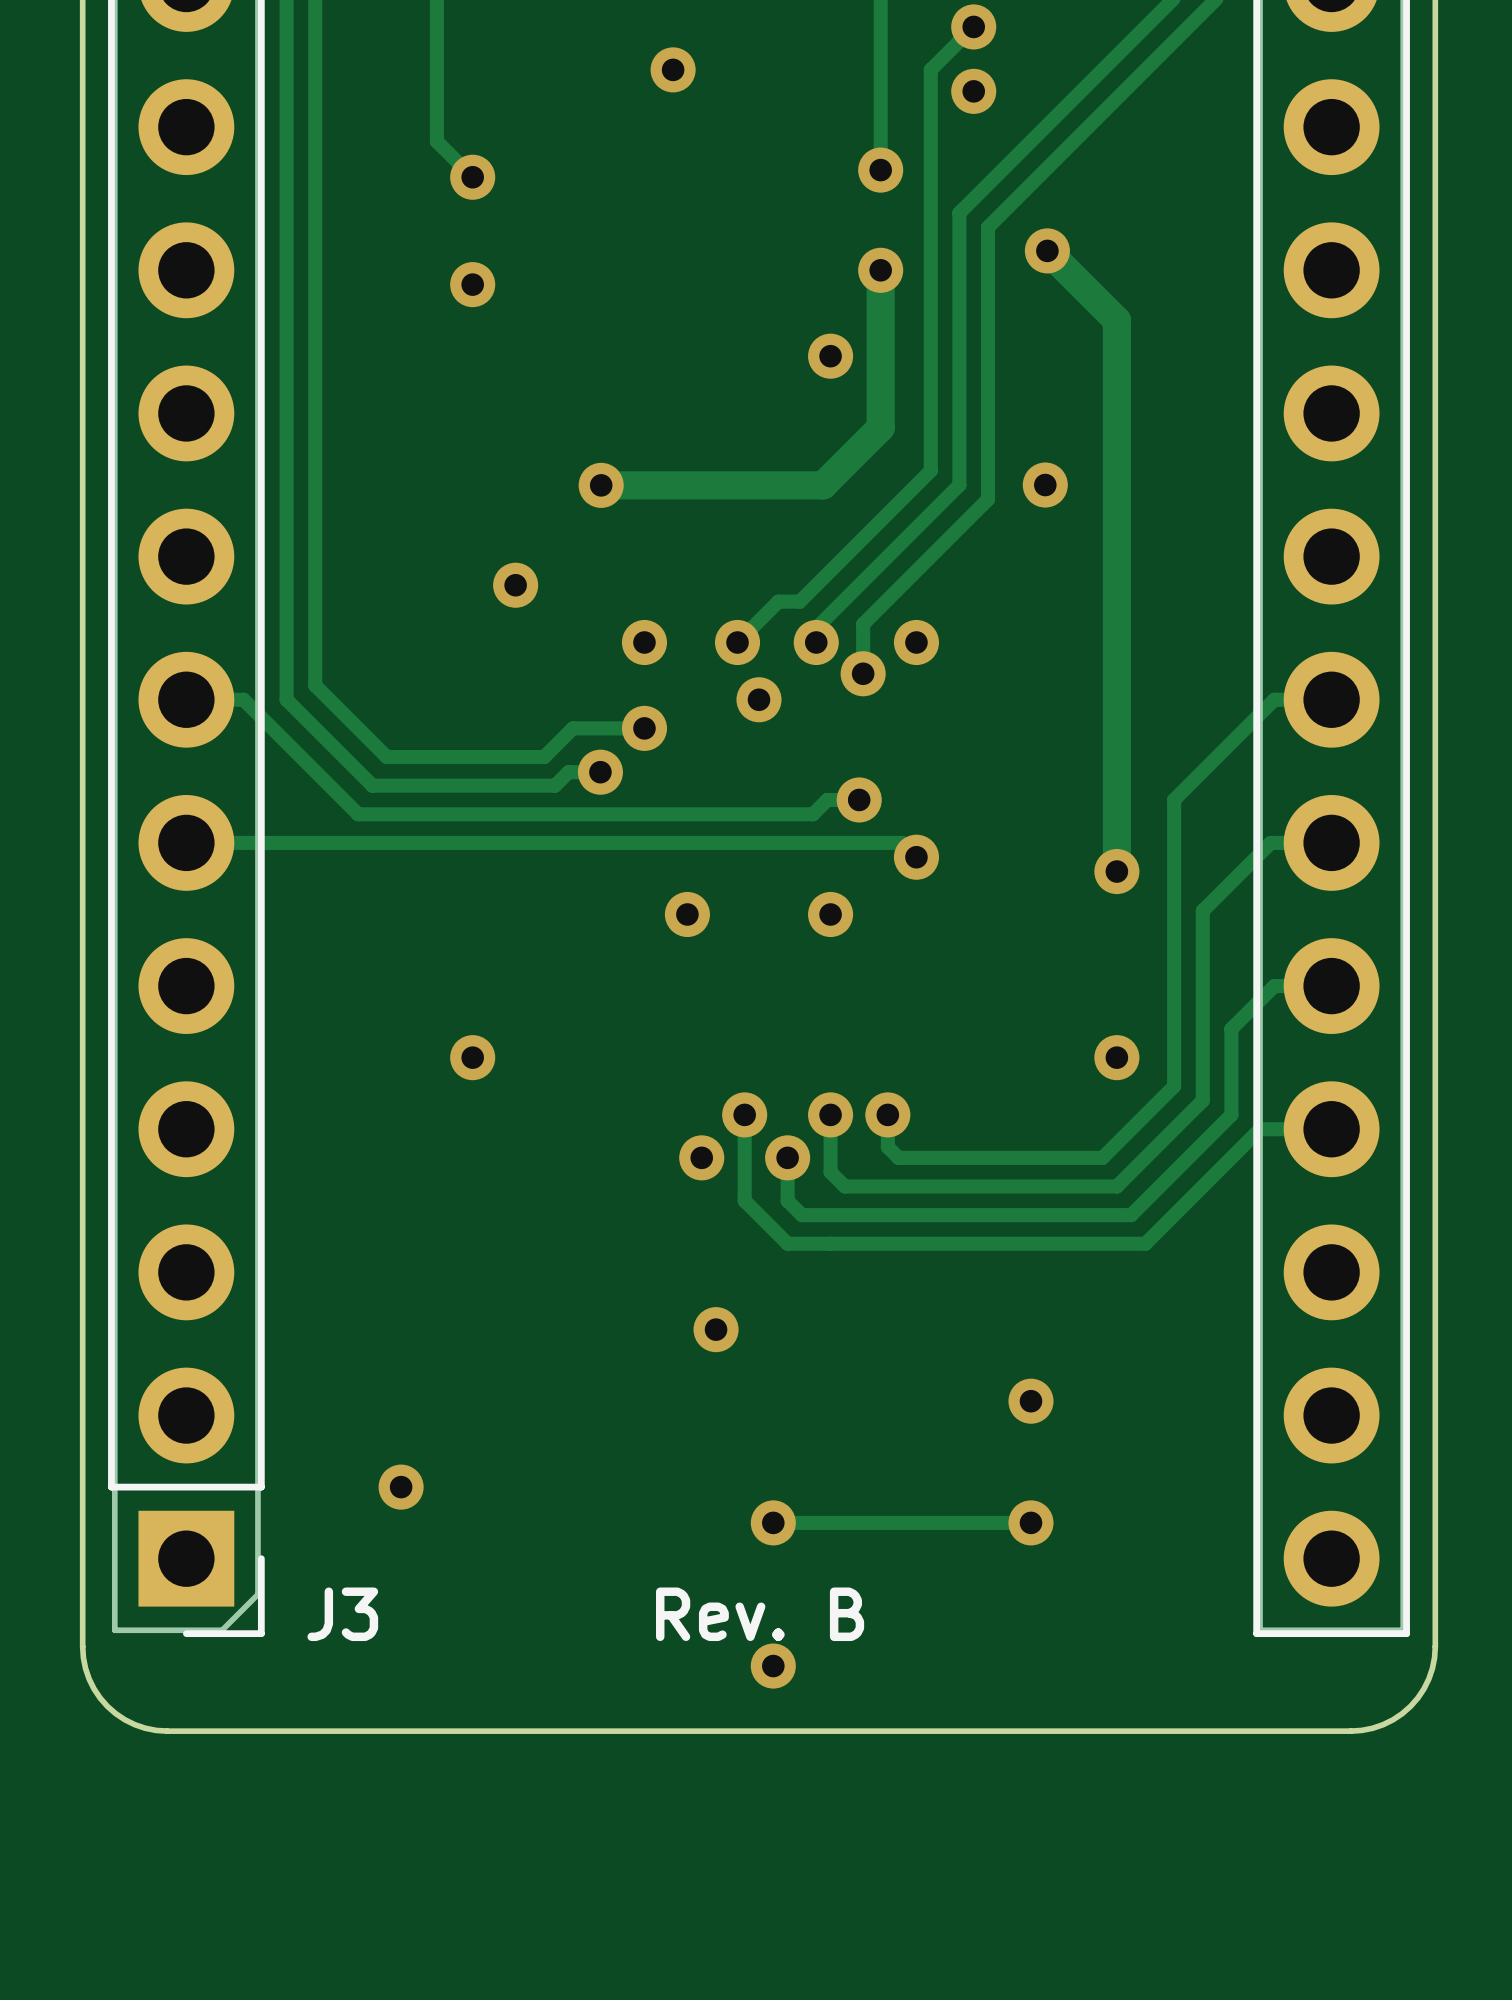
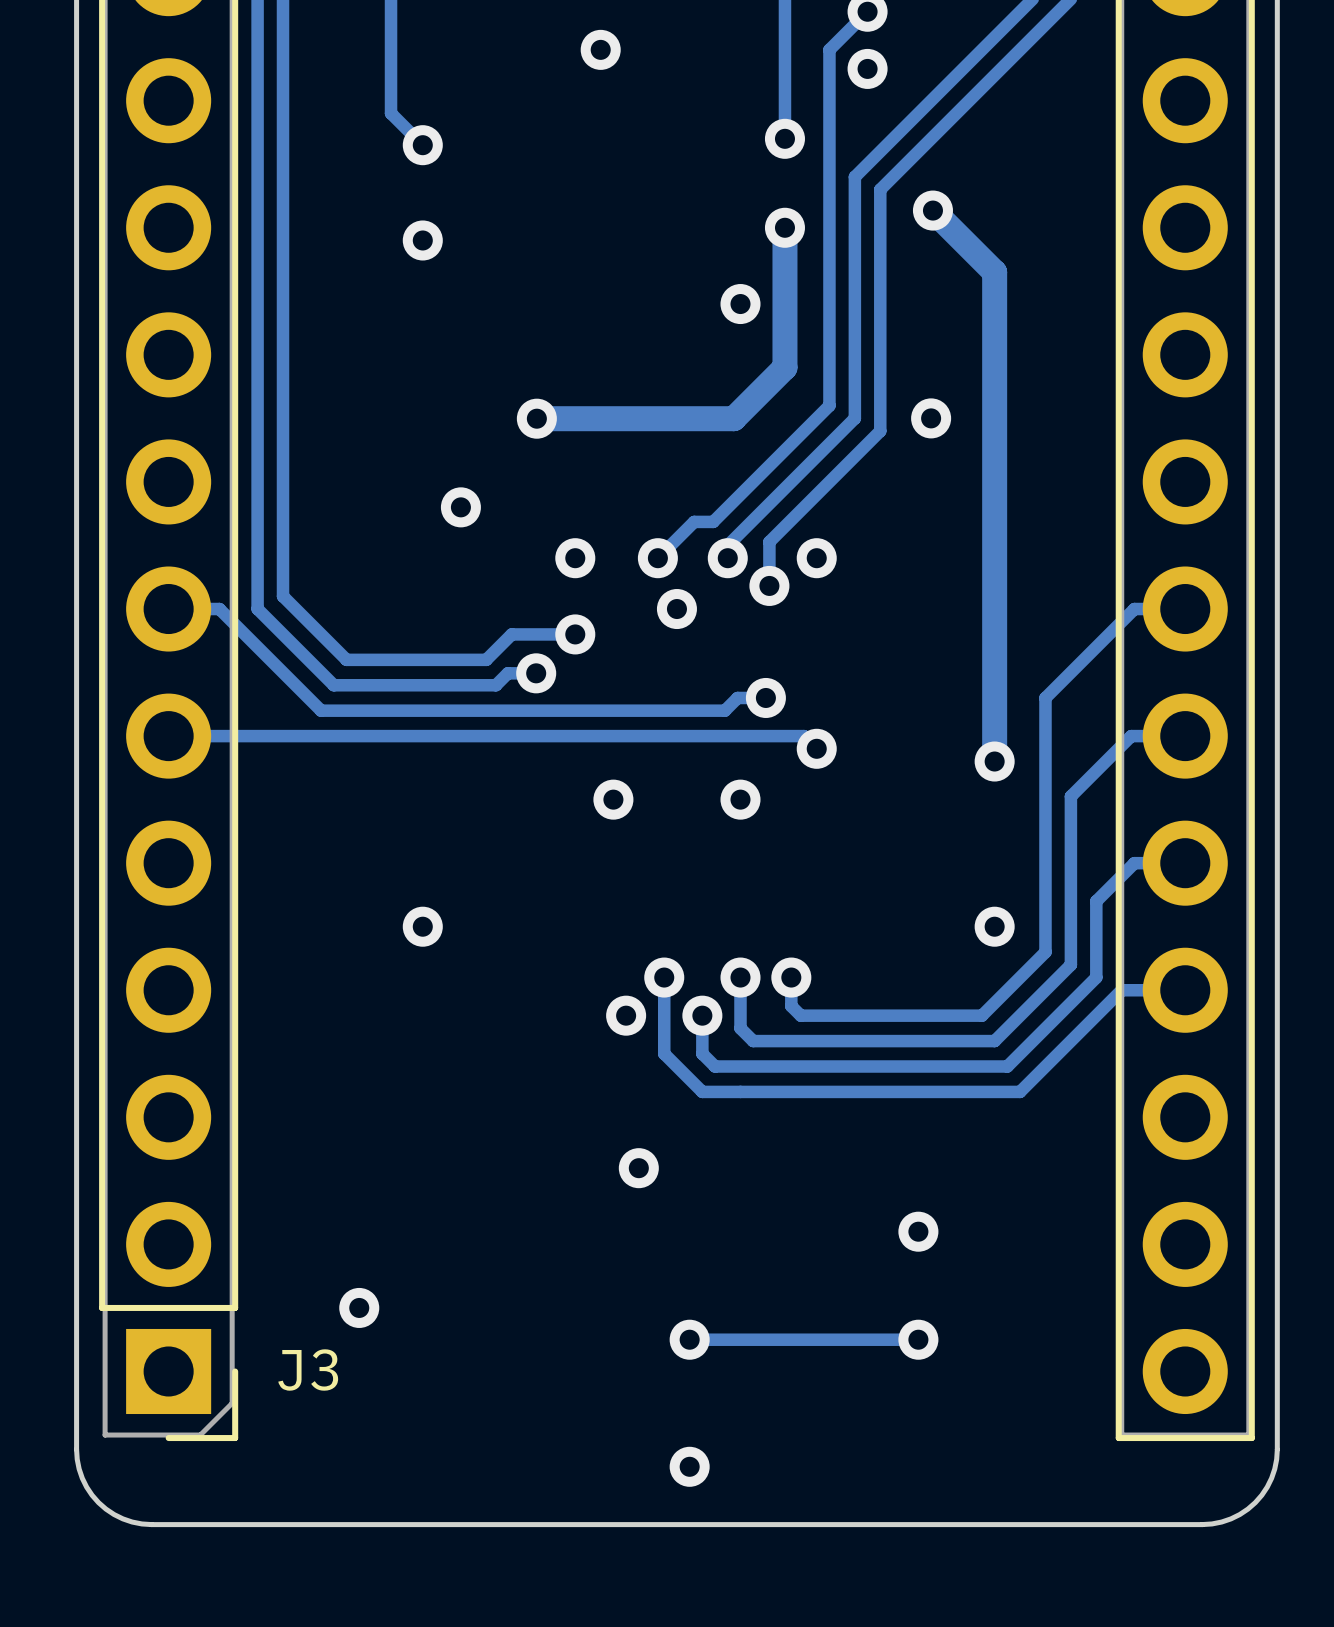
J3 name position: J3 (342, 1614) -> J3 (308, 1370)
text: Rev. B (760, 1614) -> none

